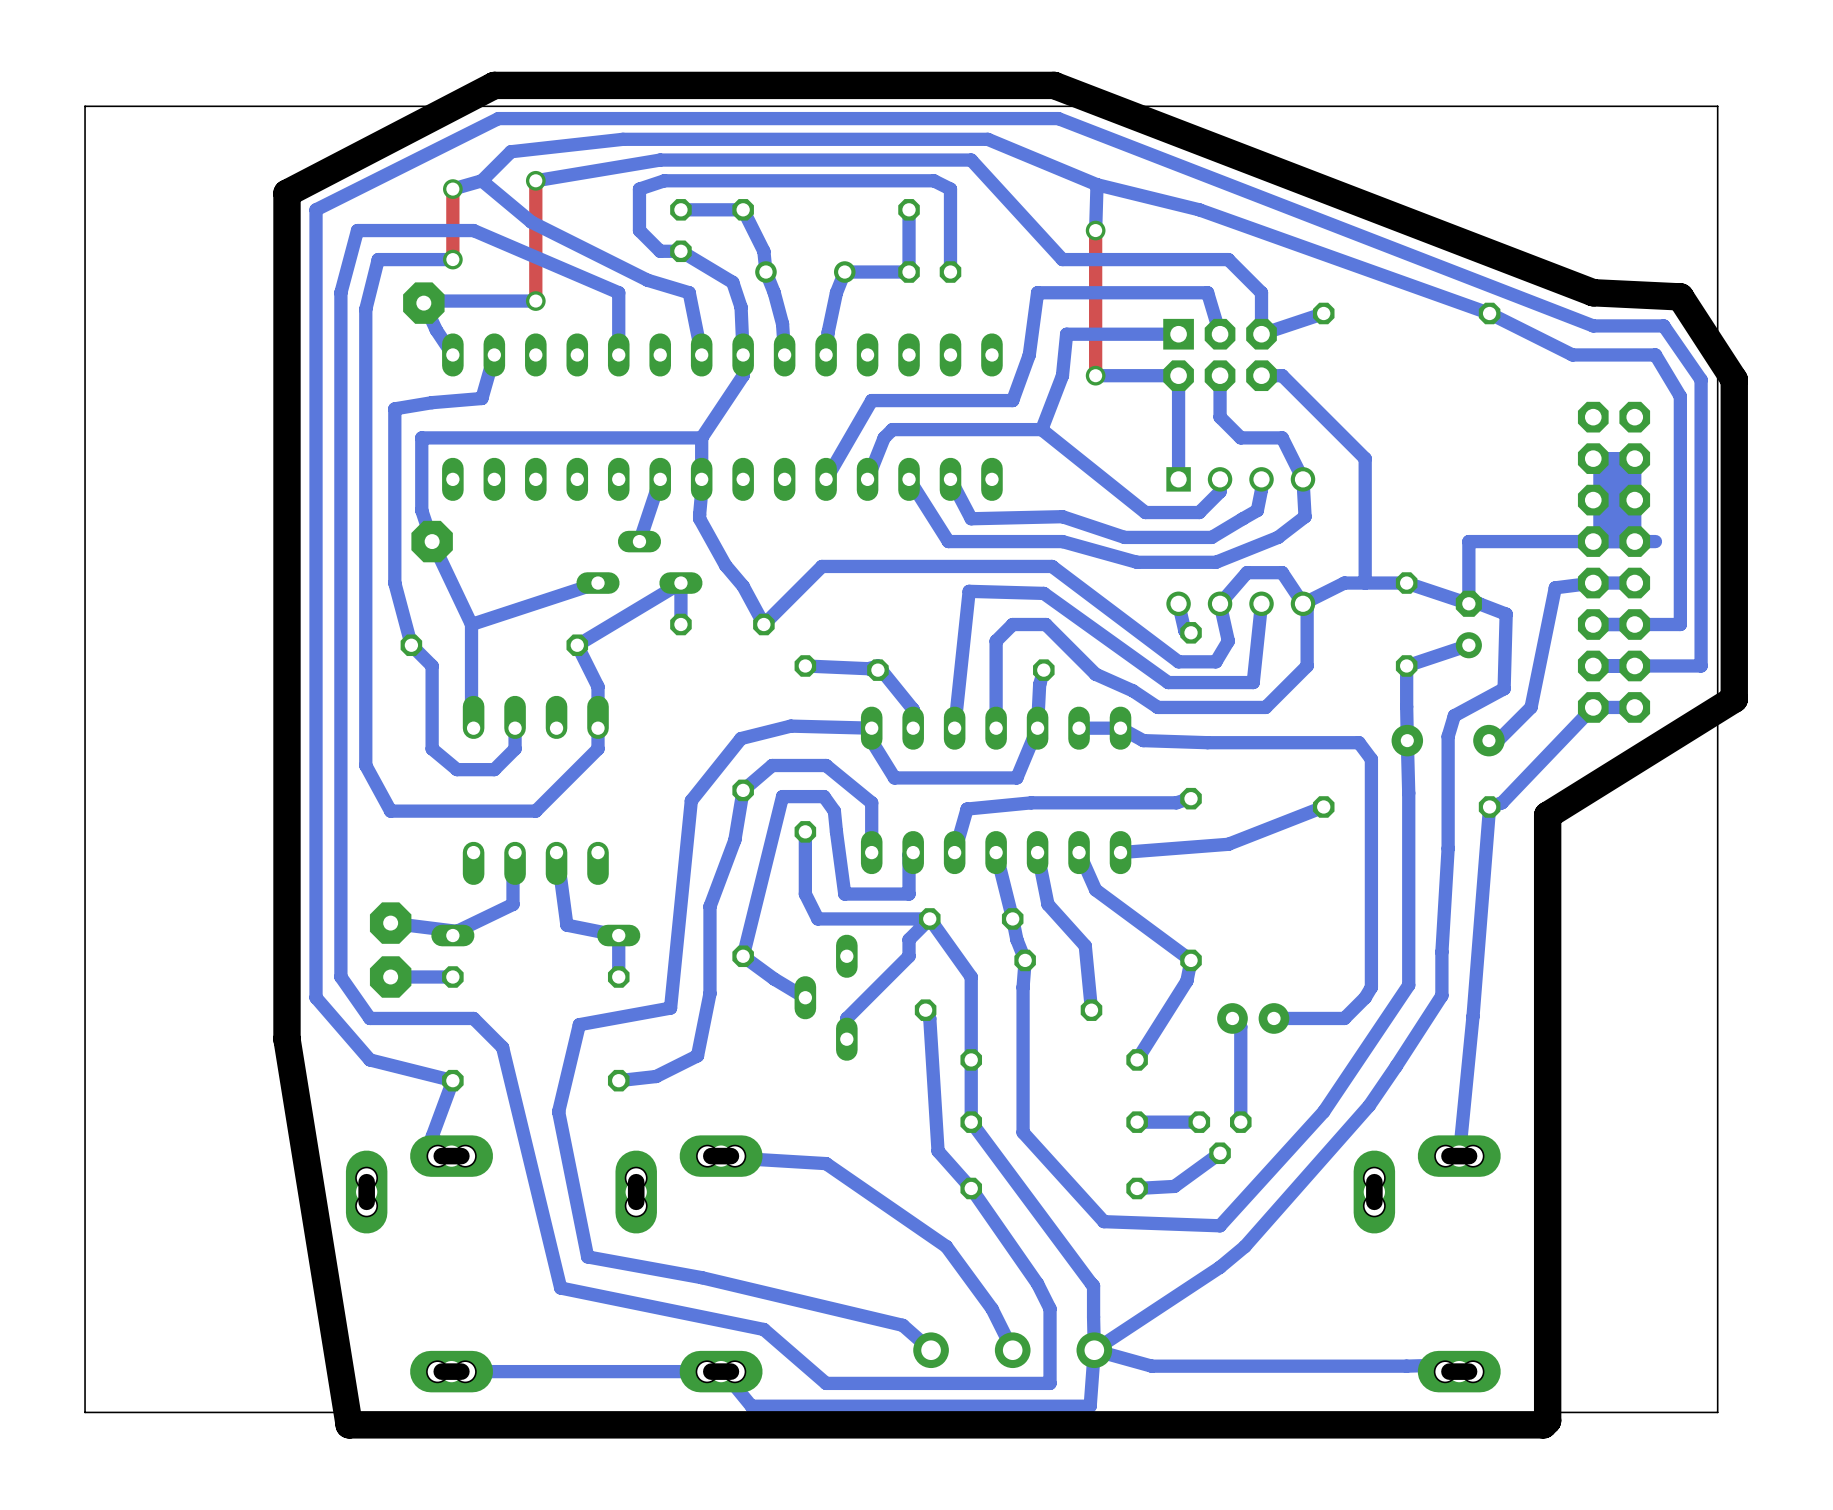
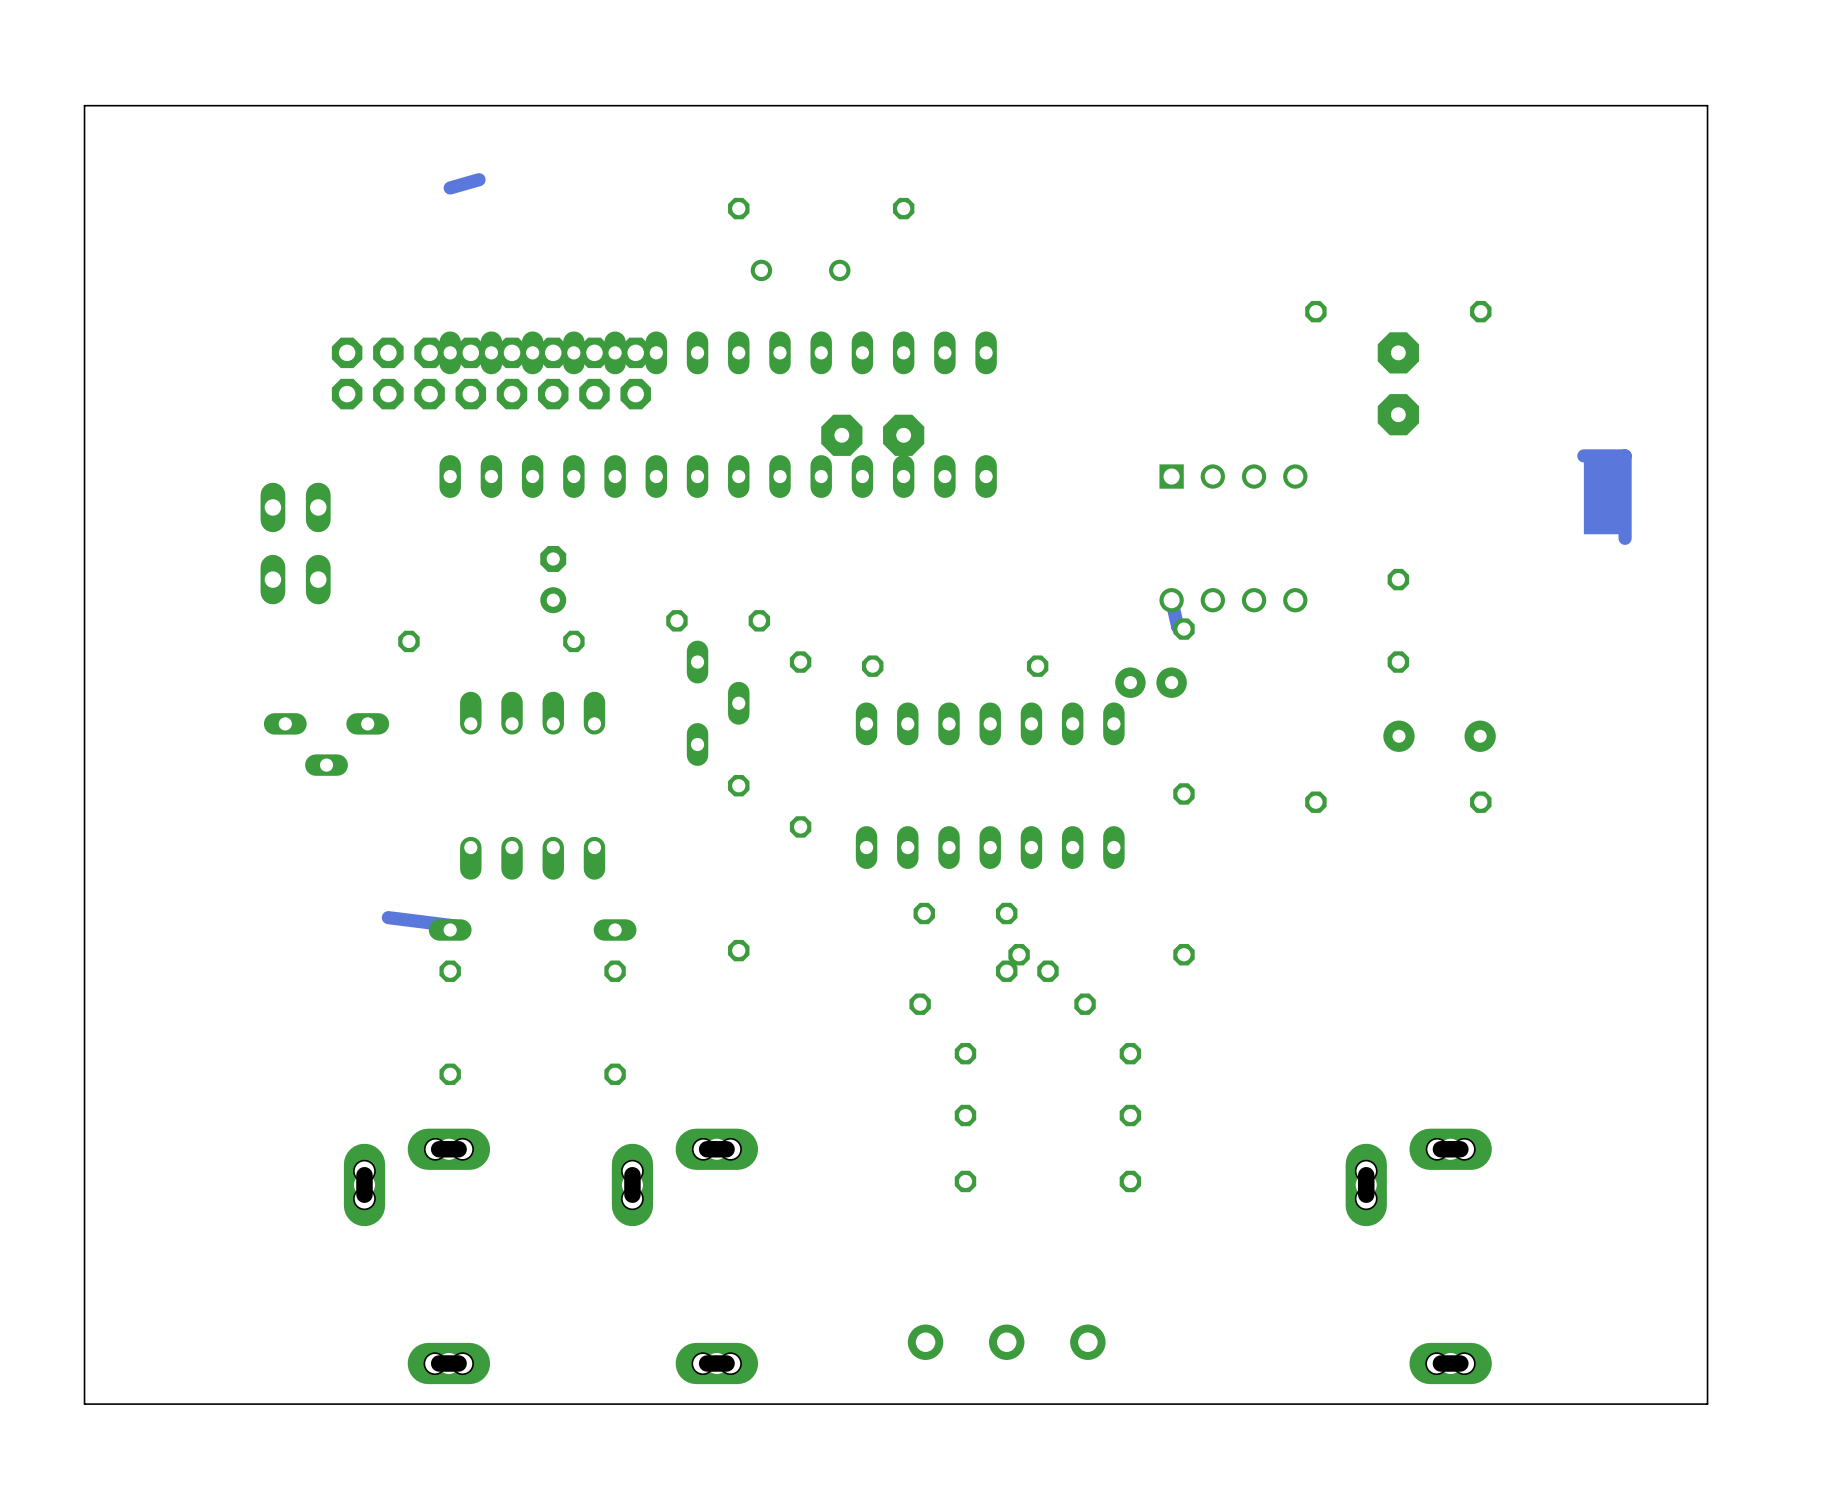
board edge: (1054, 85) (1593, 292) (1680, 296) (1734, 379) (1734, 699) (1547, 815) (1547, 1420) (1543, 1424) (349, 1424) (286, 1039) (286, 193) (494, 85) (1054, 85) -> none
bottom track: (535, 180) (660, 160) (971, 160) (1062, 259) (1228, 259) (1261, 292) (1261, 334) (1323, 313) -> none
top track: (535, 180) (535, 301) -> none
via: (535, 180) -> none
bottom track: (1097, 184) (987, 139) (622, 139) (510, 151) (481, 180) (531, 222) (647, 280) (689, 292) (701, 354) -> none
bottom track: (1097, 184) (1199, 209) (1489, 313) (1572, 354) (1655, 354) (1680, 396) (1680, 624) (1593, 624) -> none
bottom track: (1097, 184) (1095, 230) -> none
top track: (452, 189) (452, 259) -> none
via: (452, 189) -> none
bottom track: (680, 209) (743, 209) (763, 251) (765, 272) (774, 292) (782, 323) (784, 354) -> none
bottom track: (909, 209) (909, 272) (844, 272) (836, 292) (828, 332) (826, 354) -> none
part: (680, 230) -> none
top track: (1095, 230) (1095, 375) -> none
via: (1095, 230) -> none
bottom track: (452, 259) (378, 259) (365, 309) (365, 765) (390, 811) (535, 811) (598, 748) (598, 686) (577, 645) (680, 583) (680, 624) -> none
via: (452, 259) -> none
part: (929, 272) -> none
bottom track: (950, 272) (950, 189) (933, 180) (664, 180) (639, 189) (639, 230) (660, 251) (680, 251) (732, 282) (741, 307) (743, 375) (701, 437) -> none
bottom track: (535, 301) (425, 301) (423, 303) (436, 330) (452, 354) -> none
via: (535, 301) -> none
part: (423, 303) -> none
bottom track: (1178, 334) (1066, 334) (1062, 375) (1041, 429) -> none
bottom track: (1220, 334) (1207, 292) (1037, 292) (1029, 354) (1012, 400) (871, 400) (826, 479) -> none
bottom track: (494, 354) (481, 398) (432, 402) (394, 408) (394, 583) (411, 645) (432, 665) (432, 748) (457, 769) (494, 769) (515, 748) (515, 728) -> none
bottom track: (618, 354) (618, 292) (473, 230) (357, 230) (340, 292) (340, 977) (369, 1018) (473, 1018) (502, 1047) (560, 1288) (763, 1329) (826, 1383) (1050, 1383) (1050, 1308) (1037, 1283) (971, 1188) (938, 1151) (929, 1018) (925, 1010) -> none
part: (1220, 354) -> none
part: none -> (1398, 352)
part: none -> (491, 373)
bottom track: (1095, 375) (1178, 375) (1178, 479) -> none
via: (1095, 375) -> none
bottom track: (1220, 375) (1220, 417) (1240, 437) (1282, 437) (1302, 479) (1305, 516) (1278, 537) (1215, 562) (1137, 562) (1062, 541) (948, 541) (909, 479) -> none
bottom track: (1261, 375) (1282, 375) (1365, 458) (1365, 583) -> none
part: none -> (1398, 414)
bottom track: (1041, 429) (892, 429) (884, 437) (867, 479) -> none
bottom track: (1041, 429) (1145, 512) (1199, 512) (1220, 491) (1220, 479) -> none
bottom track: (701, 437) (421, 437) (421, 510) (432, 541) (471, 624) -> none
bottom track: (701, 437) (701, 479) (703, 469) (699, 518) (725, 565) (743, 586) (763, 624) (821, 566) (1052, 566) (1178, 661) (1215, 661) (1228, 641) (1220, 603) (1247, 572) (1282, 572) (1302, 603) -> none
part: none -> (841, 435)
part: none -> (903, 435)
bottom track: (660, 479) (639, 541) -> none
bottom track: (1261, 479) (1257, 510) (1211, 537) (1124, 537) (1062, 516) (971, 518) (950, 479) -> none
part: none -> (295, 507)
part: (432, 541) -> none
bottom track: (1655, 541) (1468, 541) (1468, 603) -> none
part: (639, 562) -> none
part: (1614, 562) -> none
part: none -> (295, 579)
part: none -> (553, 579)
bottom track: (598, 583) (471, 624) -> none
bottom track: (1634, 583) (1593, 583) (1555, 587) (1531, 707) (1497, 740) (1488, 740) -> none
bottom track: (1261, 603) (1253, 682) (1168, 682) (1043, 593) (969, 591) (954, 728) -> none
bottom track: (1302, 603) (1307, 607) (1307, 665) (1265, 707) (1157, 707) (1132, 690) (1095, 674) (1045, 624) (1012, 624) (996, 641) (996, 728) -> none
bottom track: (1468, 603) (1406, 583) (1344, 583) (1302, 603) -> none
bottom track: (1468, 603) (1479, 603) (1506, 614) (1504, 688) (1454, 715) (1448, 736) (1448, 848) (1441, 952) (1441, 995) (1369, 1105) (1244, 1246) (1220, 1267) (1094, 1350) -> none
bottom track: (471, 624) (471, 728) (473, 728) -> none
part: (1468, 624) -> none
bottom track: (1468, 645) (1406, 665) (1408, 985) (1323, 1111) (1220, 1225) (1103, 1221) (1023, 1132) (1023, 987) (1025, 960) (1016, 939) (996, 852) -> none
bottom track: (805, 665) (868, 668) -> none
bottom track: (1593, 665) (1701, 665) (1701, 379) (1663, 325) (1593, 325) (1058, 118) (498, 118) (316, 209) (316, 997) (369, 1059) (452, 1080) (432, 1136) (451, 1156) -> none
bottom track: (868, 668) (877, 665) (913, 709) (913, 728) -> none
bottom track: (1043, 670) (1039, 684) (1037, 728) (1016, 777) (894, 777) (867, 734) (871, 728) (790, 726) (741, 738) (691, 800) (670, 1008) (579, 1024) (558, 1111) (587, 1256) (701, 1277) (902, 1325) (931, 1350) -> none
part: none -> (718, 703)
bottom track: (1634, 707) (1593, 707) (1502, 802) (1489, 806) (1473, 1016) (1459, 1156) -> none
bottom track: (1079, 728) (1120, 728) (1143, 740) (1358, 742) (1371, 759) (1371, 987) (1365, 997) (1344, 1018) (1273, 1018) -> none
part: none -> (326, 744)
bottom track: (1191, 798) (1176, 802) (1031, 802) (967, 809) (954, 852) -> none
bottom track: (1323, 806) (1228, 844) (1120, 852) -> none
bottom track: (805, 831) (805, 894) (817, 918) (929, 918) -> none
bottom track: (515, 852) (512, 862) (512, 904) (457, 931) (452, 935) -> none
bottom track: (556, 852) (566, 925) (618, 935) (618, 977) -> none
bottom track: (871, 852) (871, 802) (826, 765) (772, 765) (743, 790) (734, 840) (709, 906) (709, 993) (697, 1055) (656, 1076) (618, 1080) -> none
bottom track: (913, 852) (909, 854) (909, 894) (844, 894) (834, 811) (824, 796) (782, 796) (743, 956) (774, 979) (805, 997) -> none
bottom track: (1037, 852) (1047, 904) (1085, 945) (1091, 1010) -> none
bottom track: (1079, 852) (1095, 889) (1191, 960) (1186, 981) (1137, 1059) -> none
bottom track: (929, 918) (971, 977) (971, 1122) (1093, 1285) (1094, 1350) -> none
bottom track: (929, 918) (909, 939) (909, 956) (846, 1018) (846, 1039) -> none
part: (390, 923) -> none
part: (390, 977) -> none
bottom track: (452, 977) (390, 977) -> none
part: none -> (1027, 971)
part: (826, 997) -> none
bottom track: (1232, 1018) (1240, 1026) (1240, 1122) -> none
part position: (1253, 1018) -> (1151, 682)
bottom track: (1199, 1122) (1137, 1122) -> none
part: (1220, 1137) -> none
bottom track: (1220, 1153) (1174, 1186) (1137, 1188) -> none
bottom track: (721, 1156) (826, 1163) (946, 1246) (991, 1308) (1012, 1350) -> none
bottom track: (1094, 1350) (1090, 1406) (751, 1406) (723, 1371) (451, 1371) -> none
bottom track: (1094, 1350) (1151, 1366) (1446, 1364) (1459, 1371) -> none

